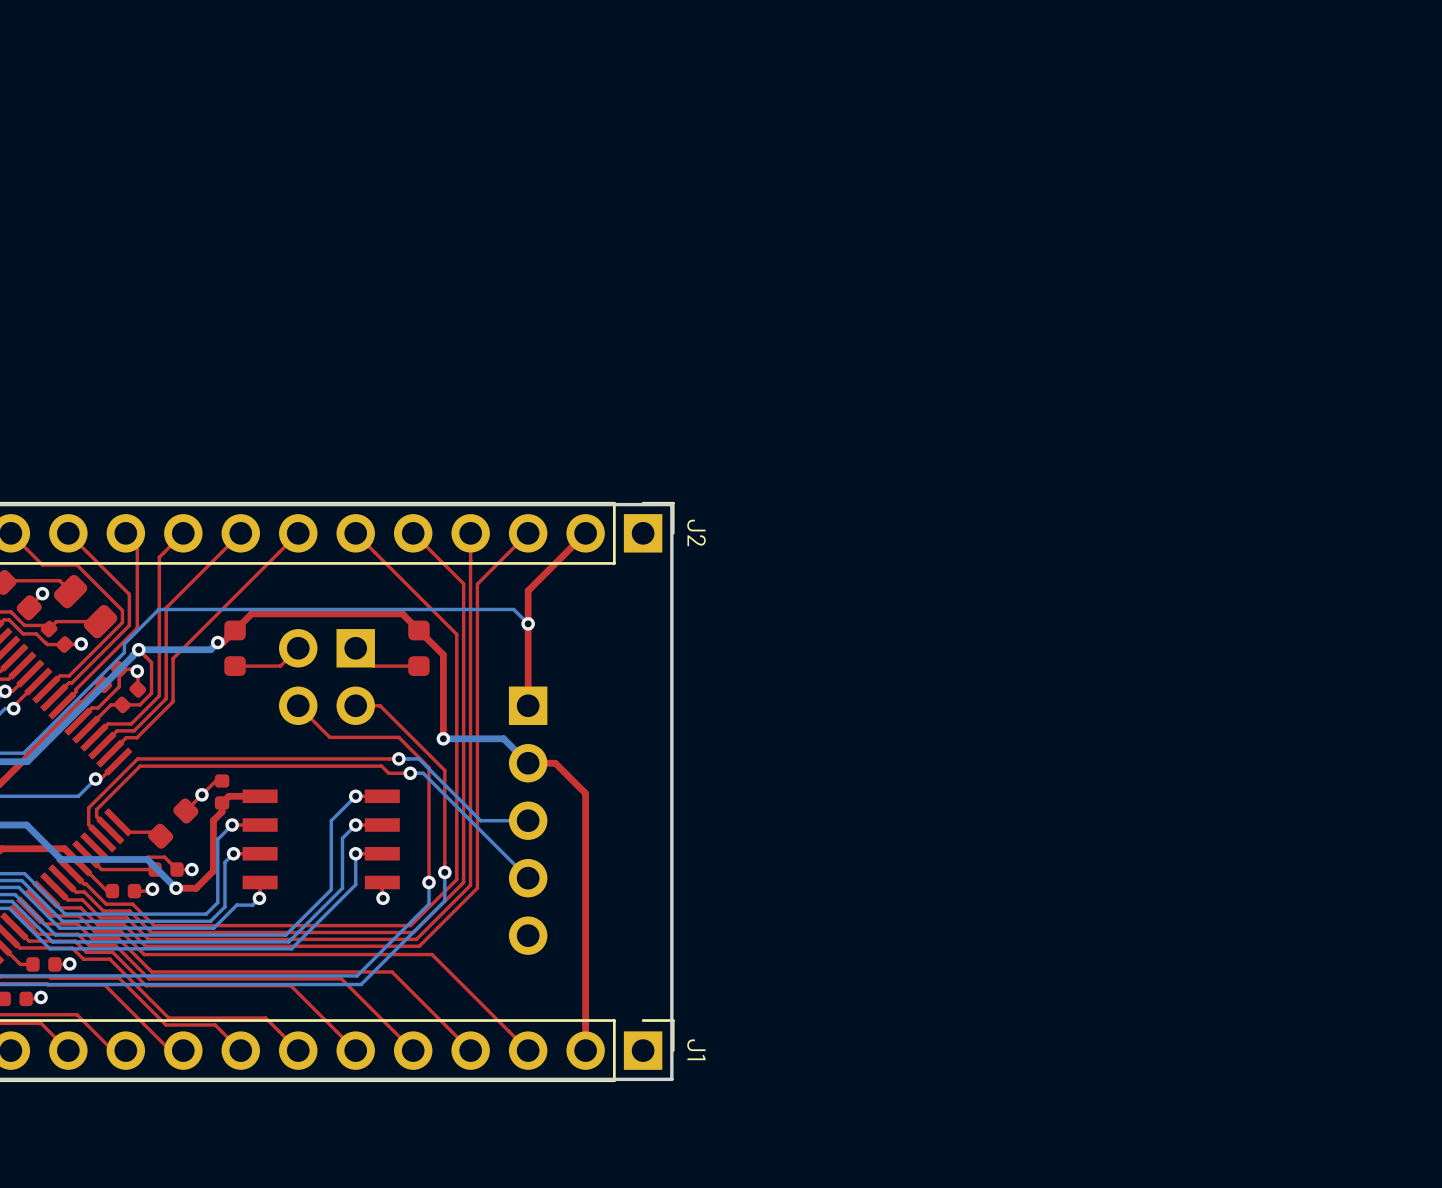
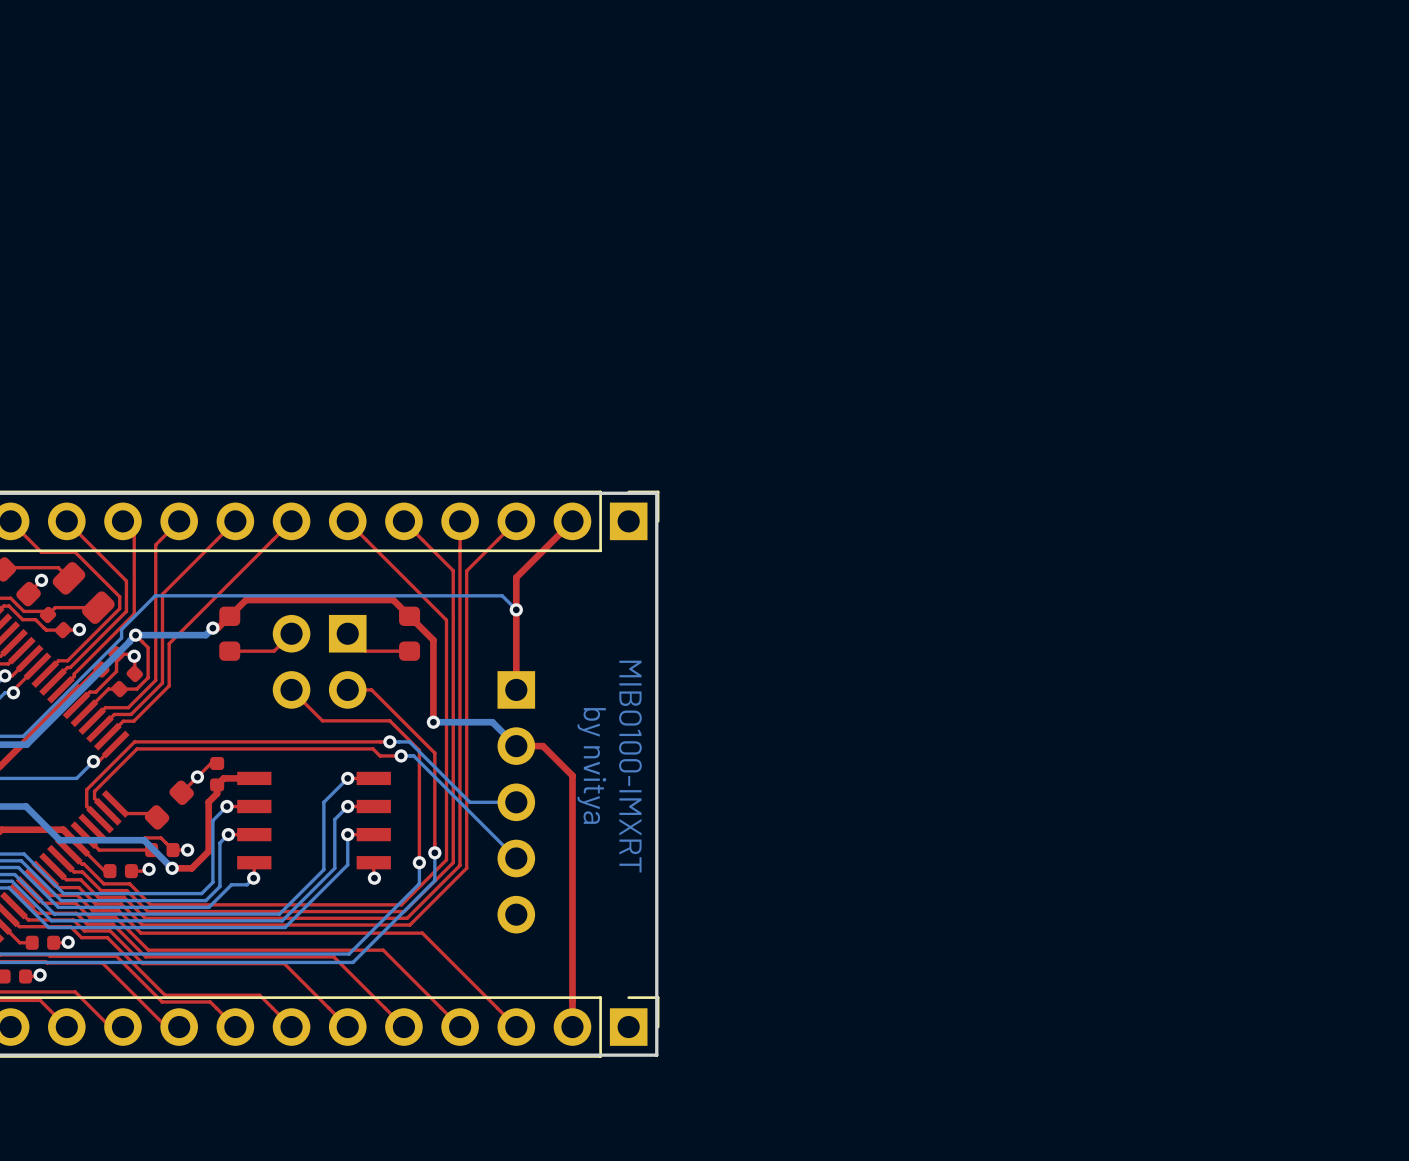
J2 name: J2 (696, 532) -> none
text: none -> by nvitya (591, 765)
text: none -> MIBO100-IMXRT (630, 766)
J1 name: J1 (696, 1049) -> none

